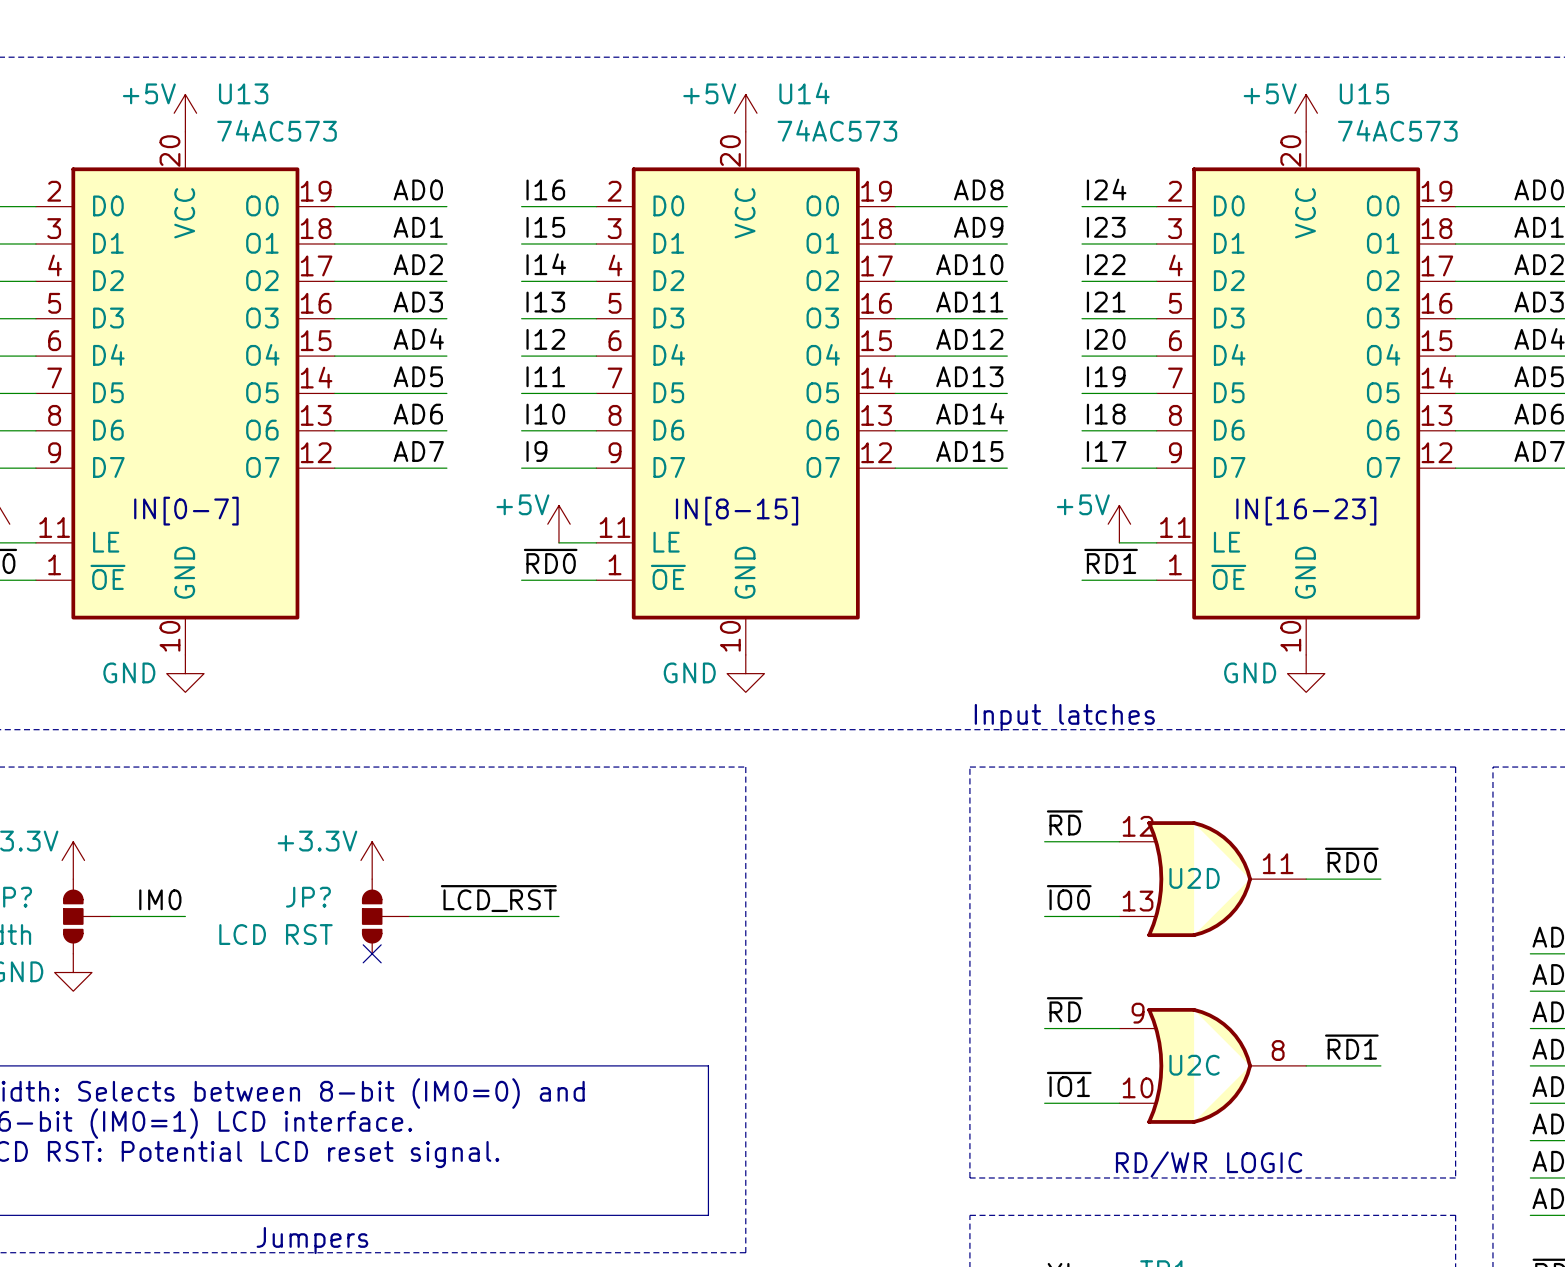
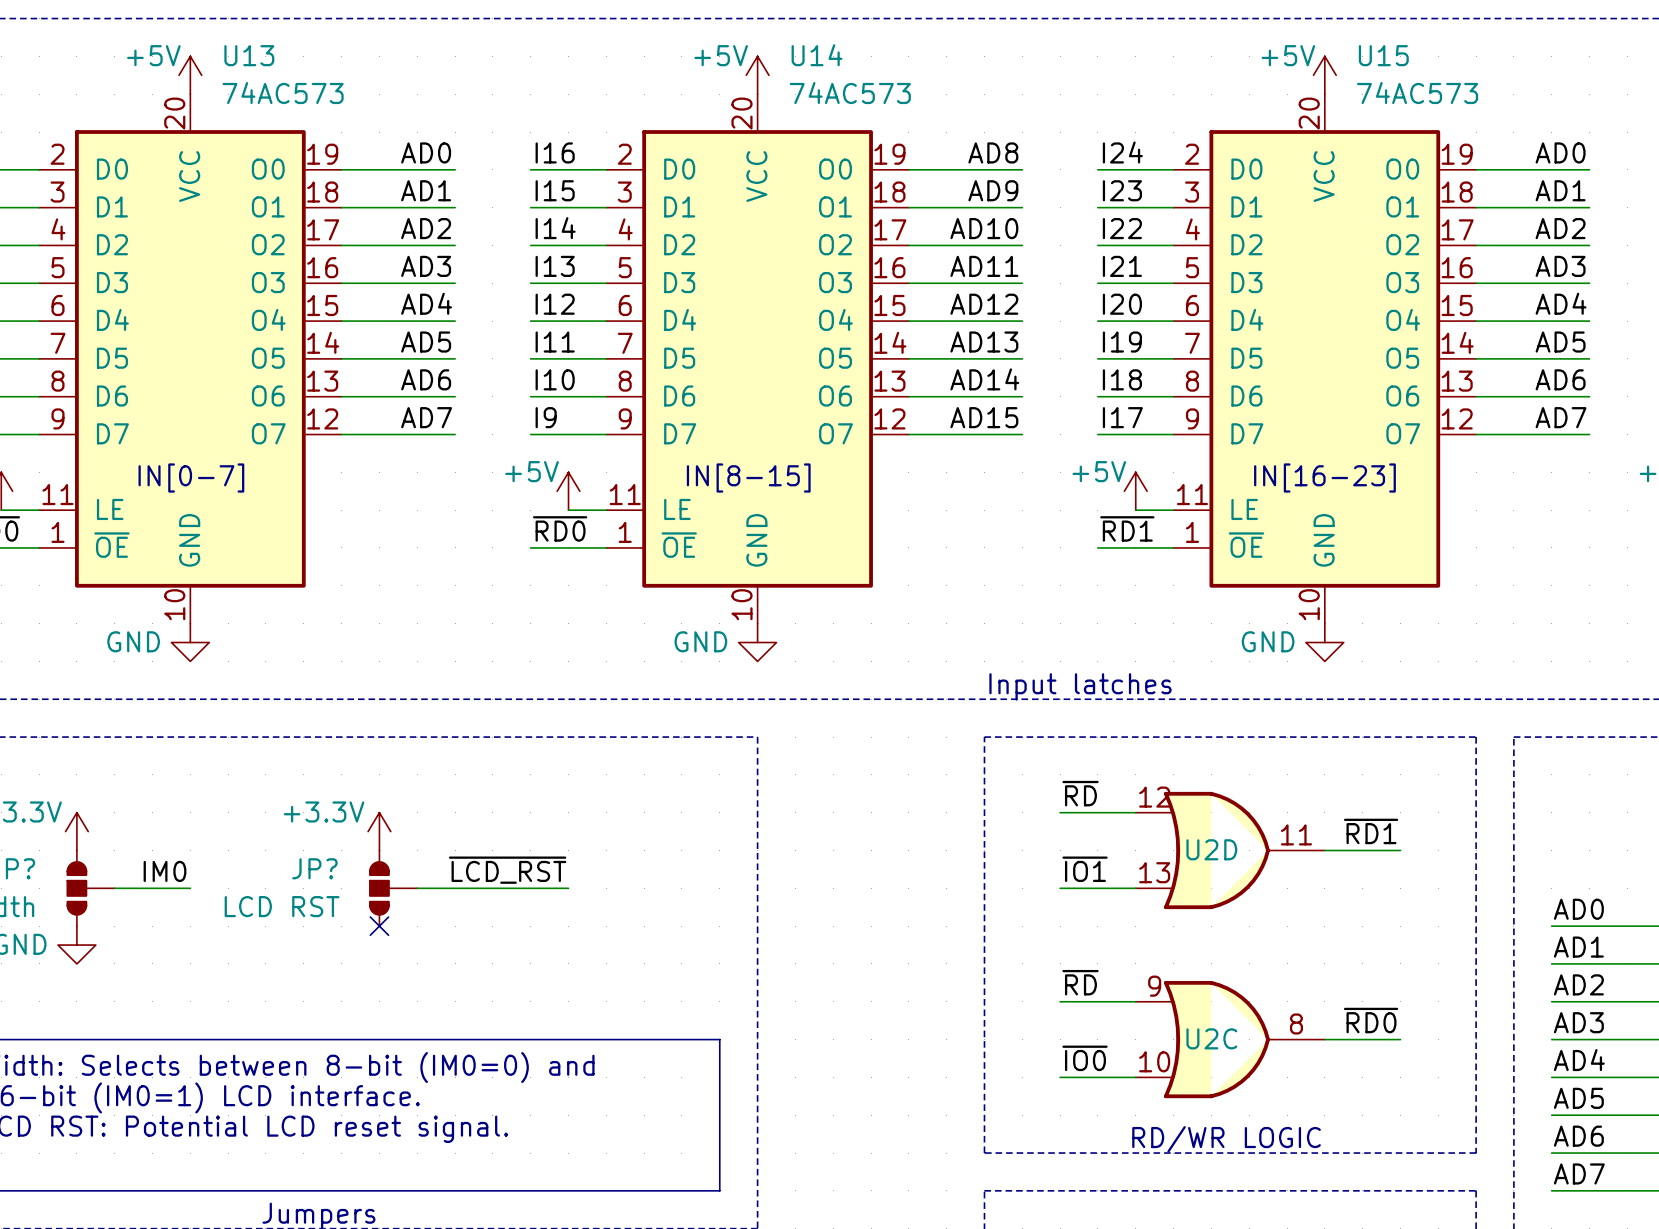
label: ~{RD0} (1351, 860) -> ~{RD1} (1371, 831)
label: ~{IO0} (1069, 897) -> ~{IO1} (1085, 869)
label: ~{RD1} (1351, 1047) -> ~{RD0} (1371, 1020)
label: ~{IO1} (1069, 1084) -> ~{IO0} (1085, 1058)

